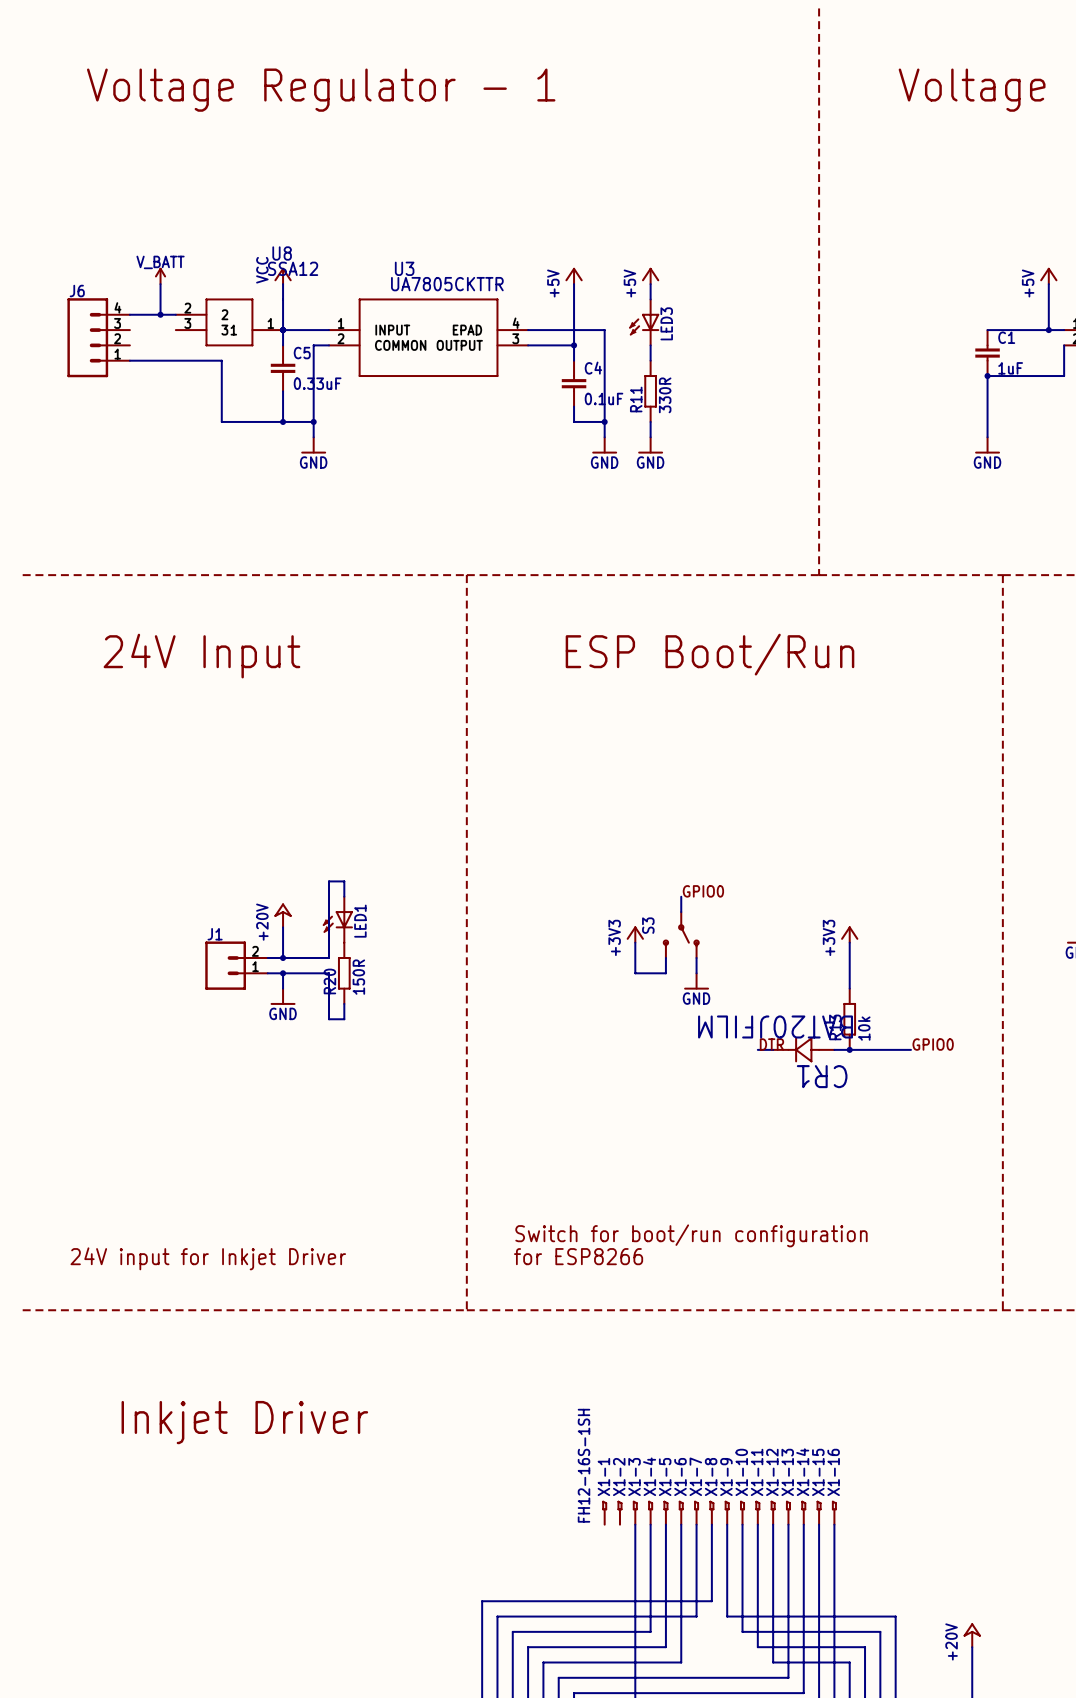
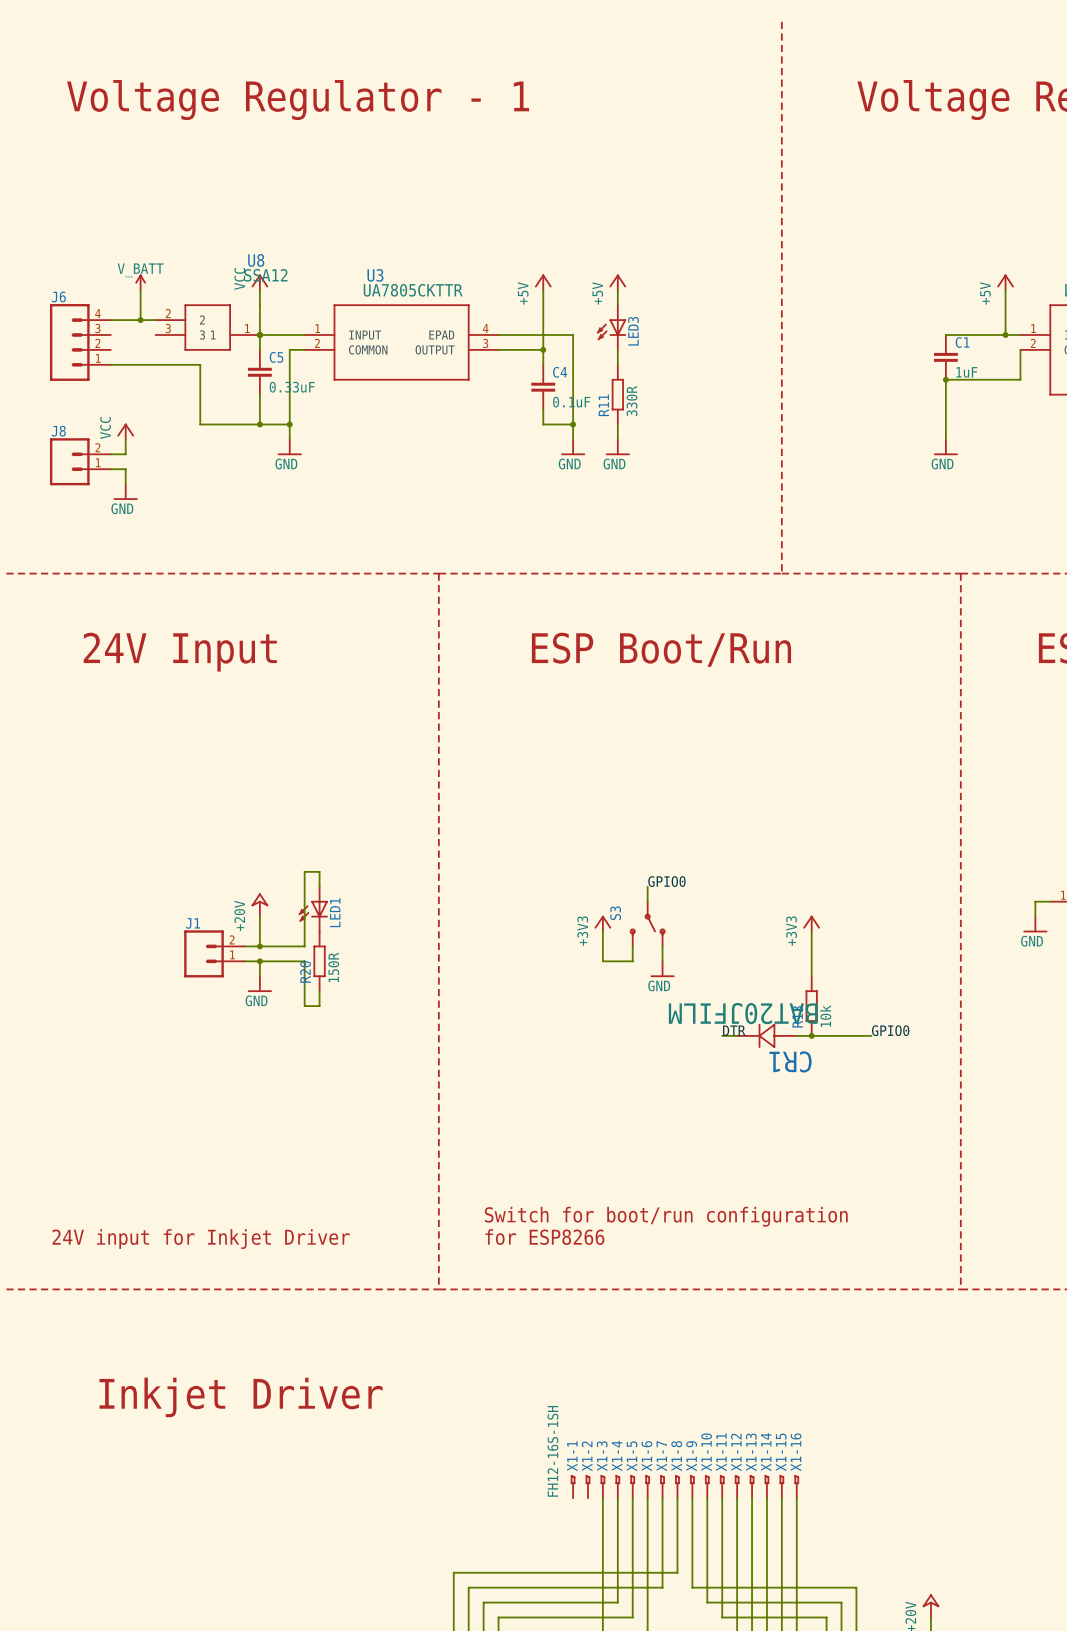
power symbol: none -> VCC (125, 431)
wire: none -> (125, 439) (125, 454) (110, 454)
J8: none -> (80, 461)
wire: none -> (110, 469) (125, 469) (125, 484)
power symbol: none -> GND (125, 491)

